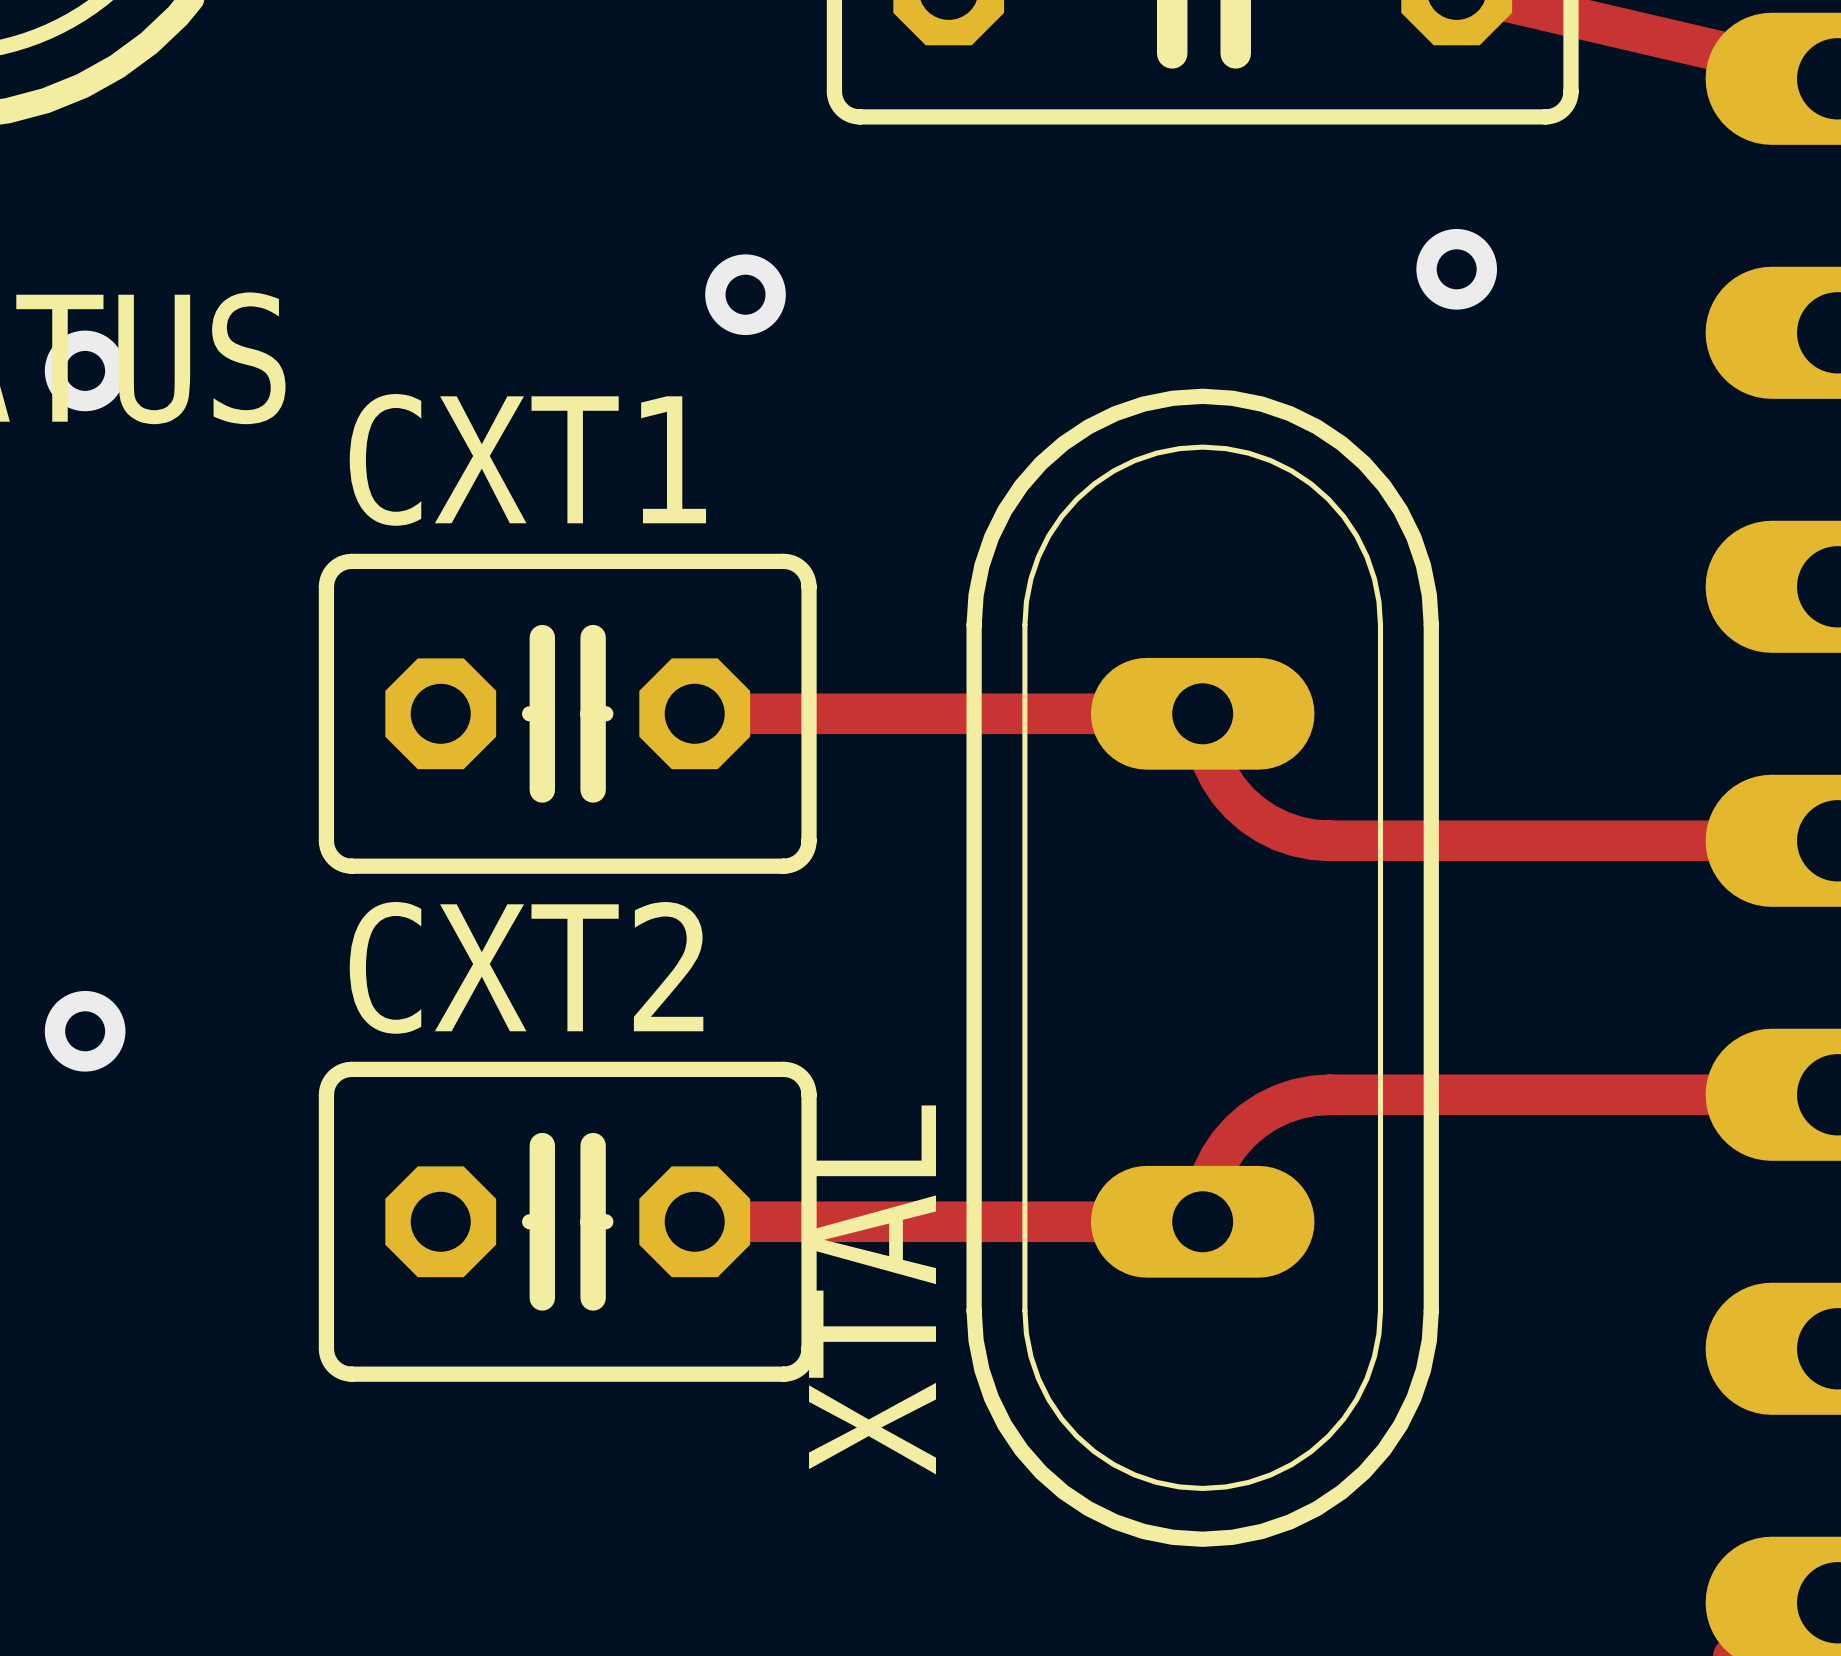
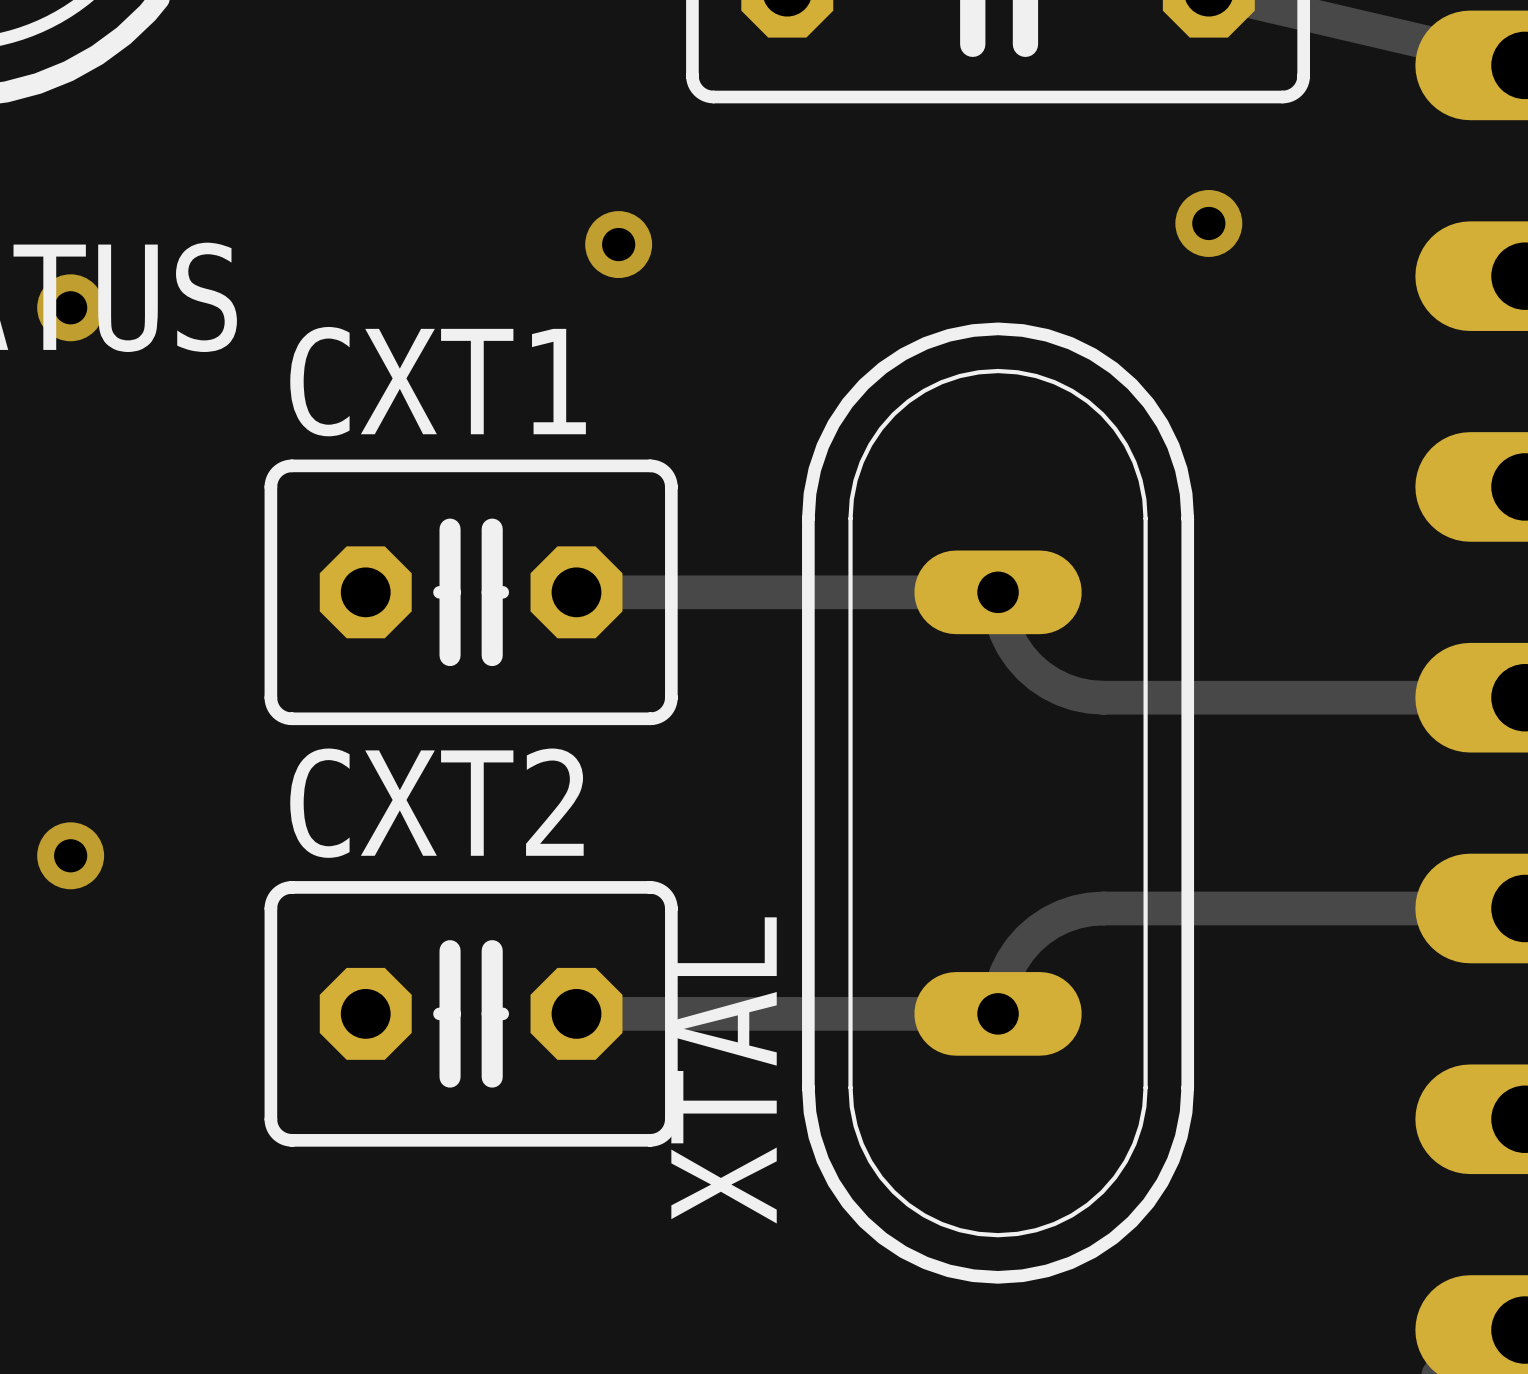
XTAL footprint: [966, 388, 1439, 1547] -> [802, 322, 1195, 1284]

